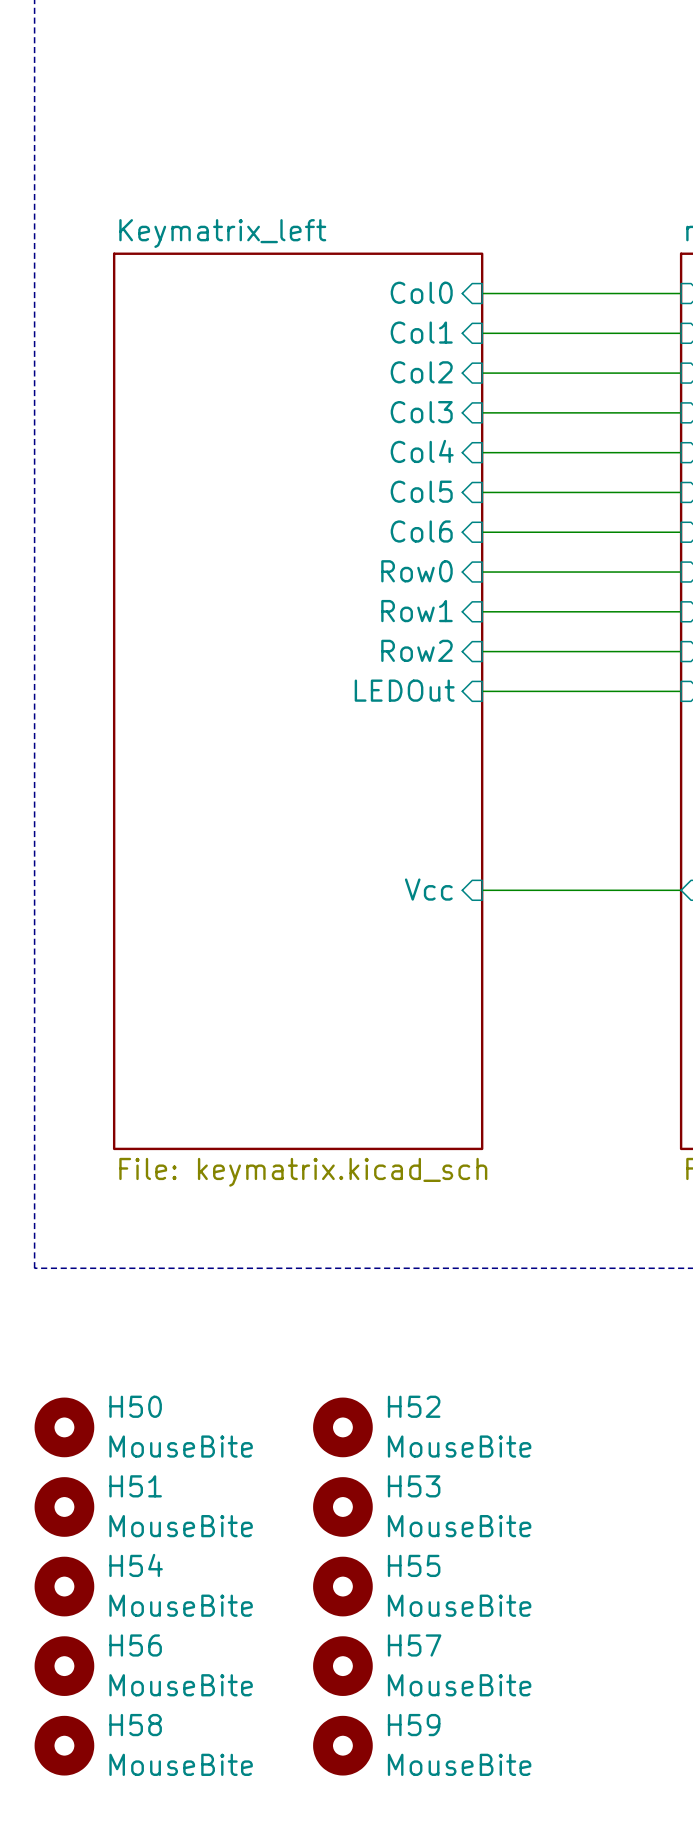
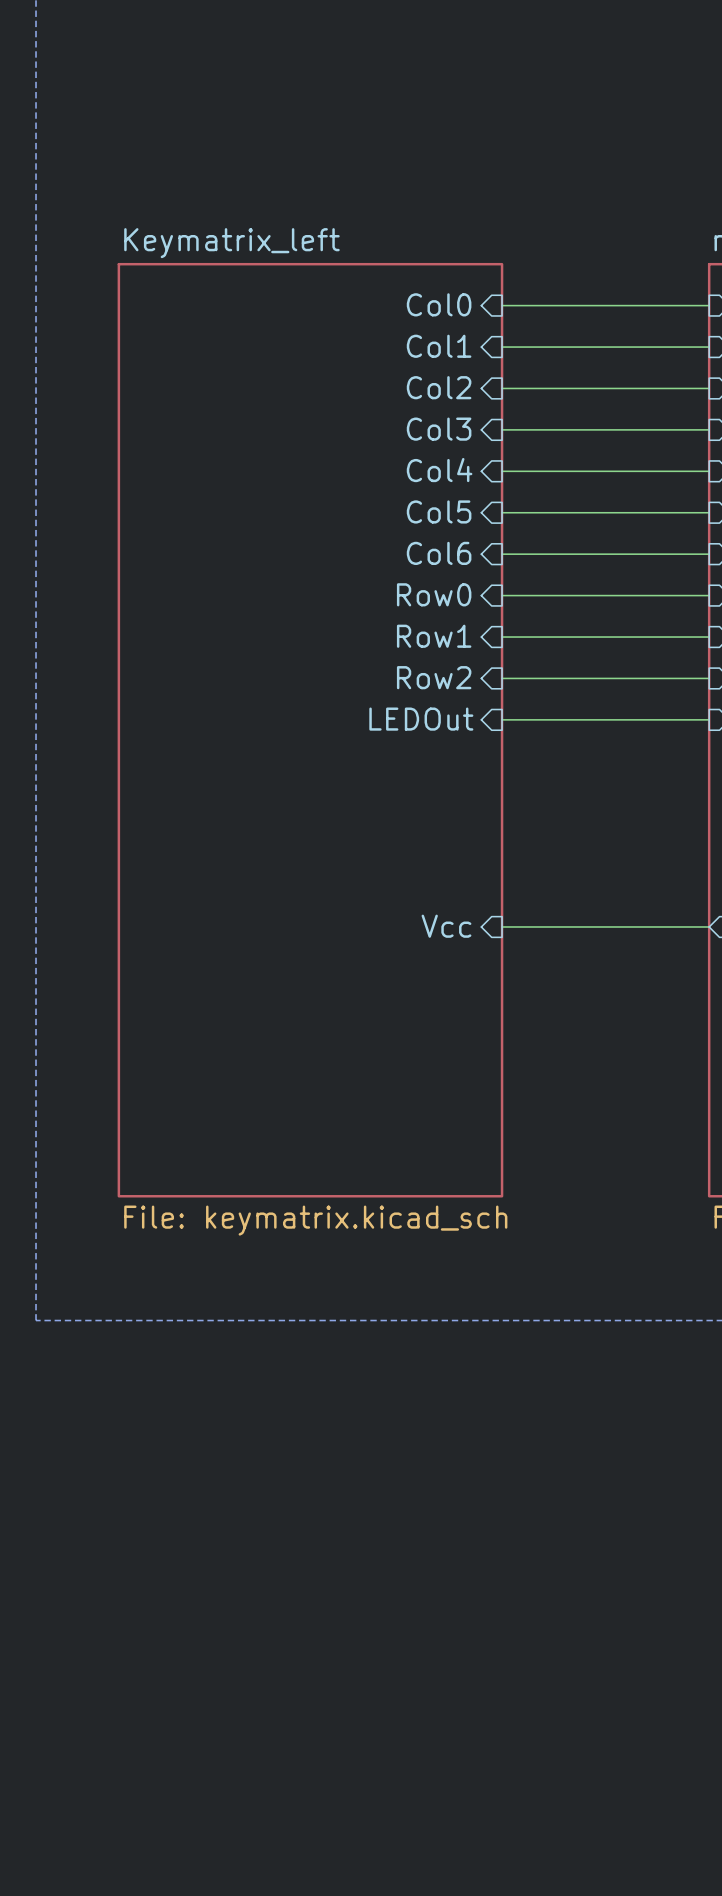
H50: MouseBite (64, 1427) -> none
H52: MouseBite (342, 1427) -> none
H51: MouseBite (64, 1506) -> none
H53: MouseBite (342, 1506) -> none
H54: MouseBite (64, 1586) -> none
H55: MouseBite (342, 1586) -> none
H56: MouseBite (64, 1666) -> none
H57: MouseBite (342, 1666) -> none
H58: MouseBite (64, 1745) -> none
H59: MouseBite (342, 1745) -> none

